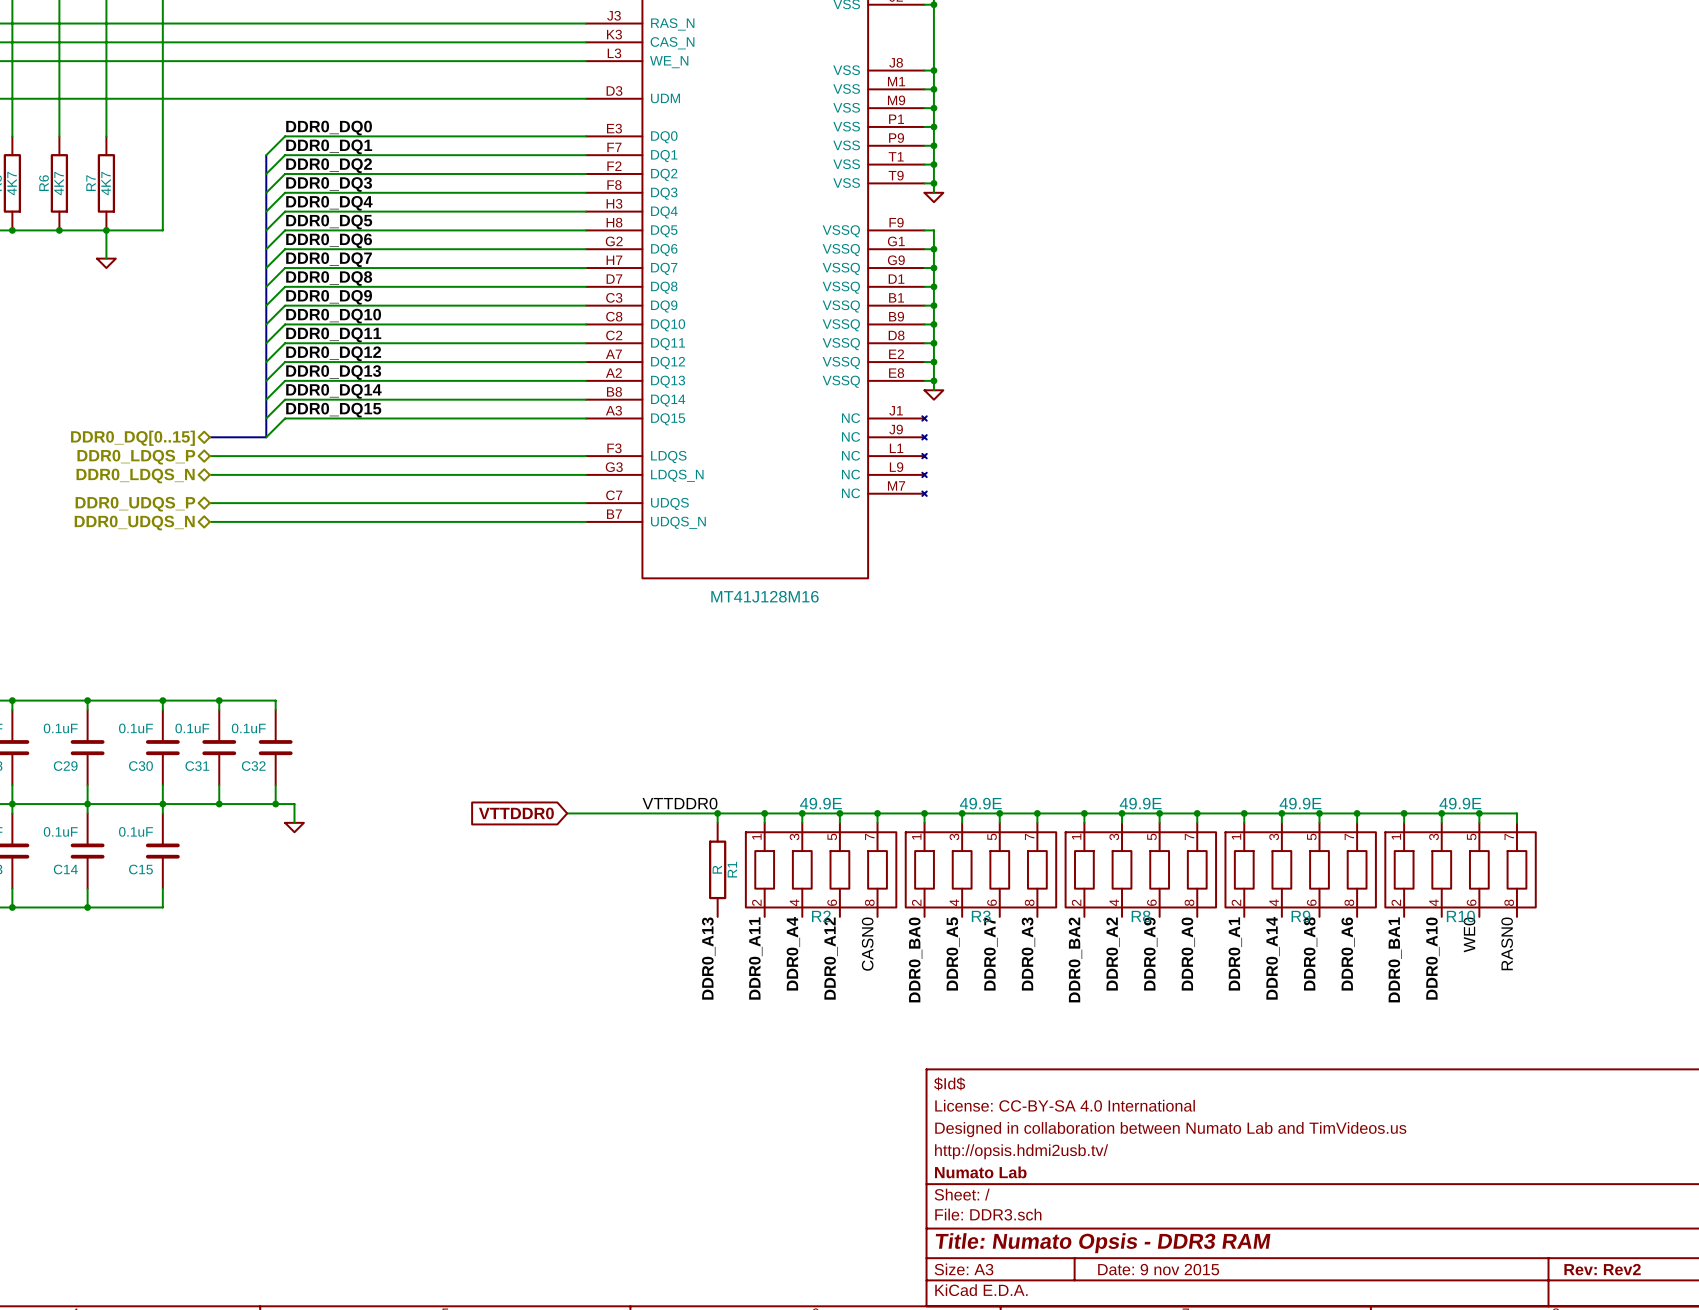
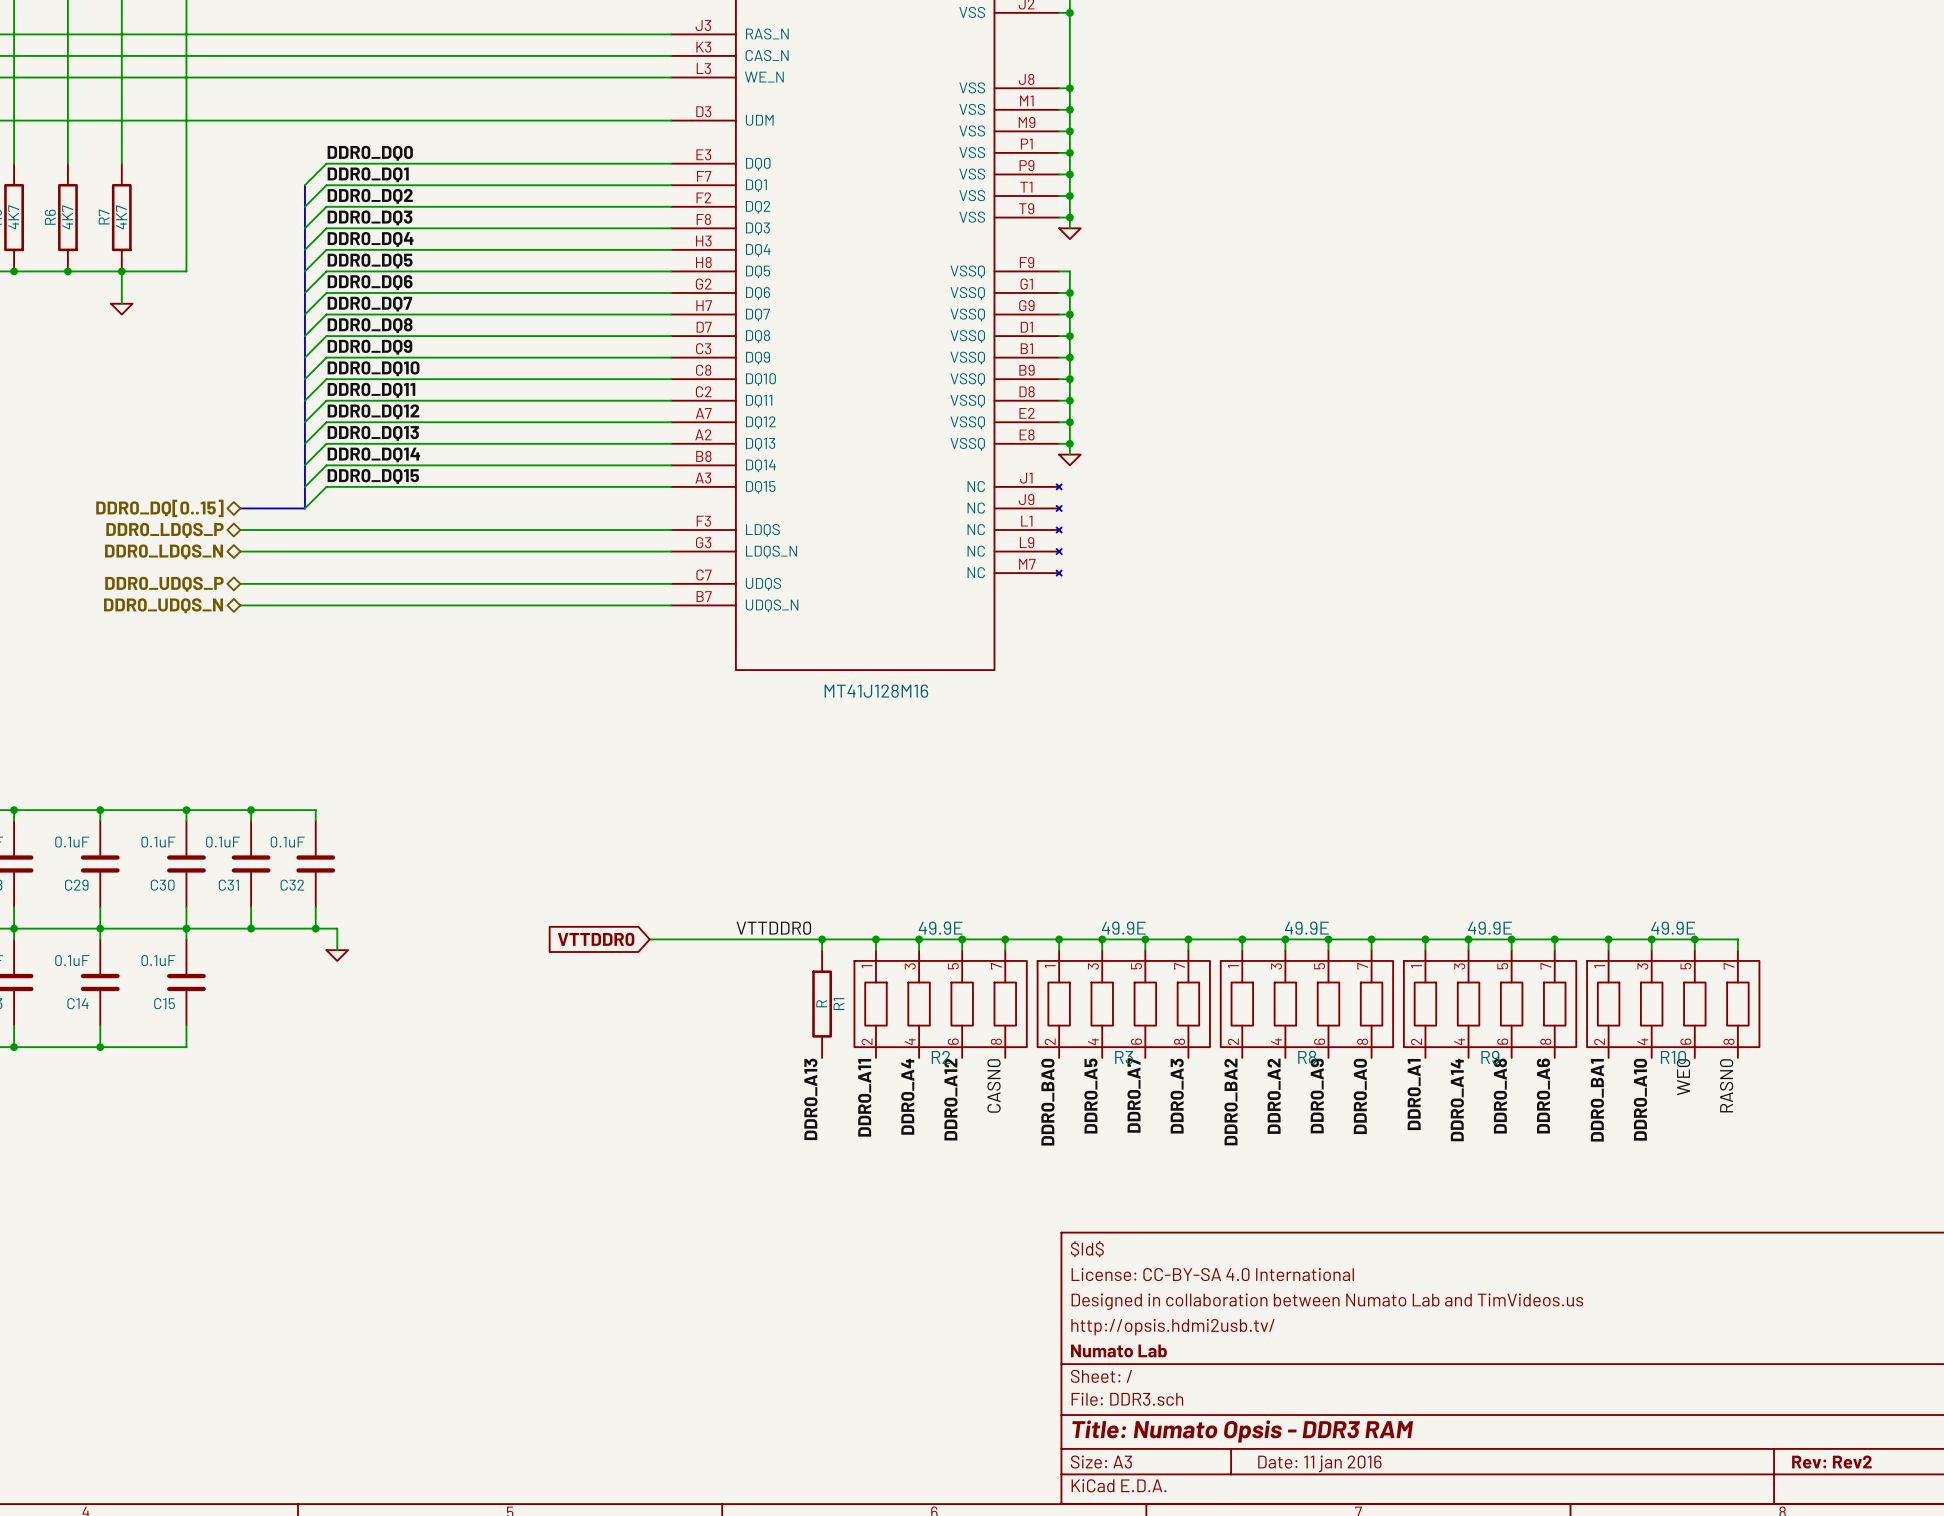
title block: Date: 9 nov 2015 (1158, 1269) -> Date: 11 jan 2016 (1319, 1463)

